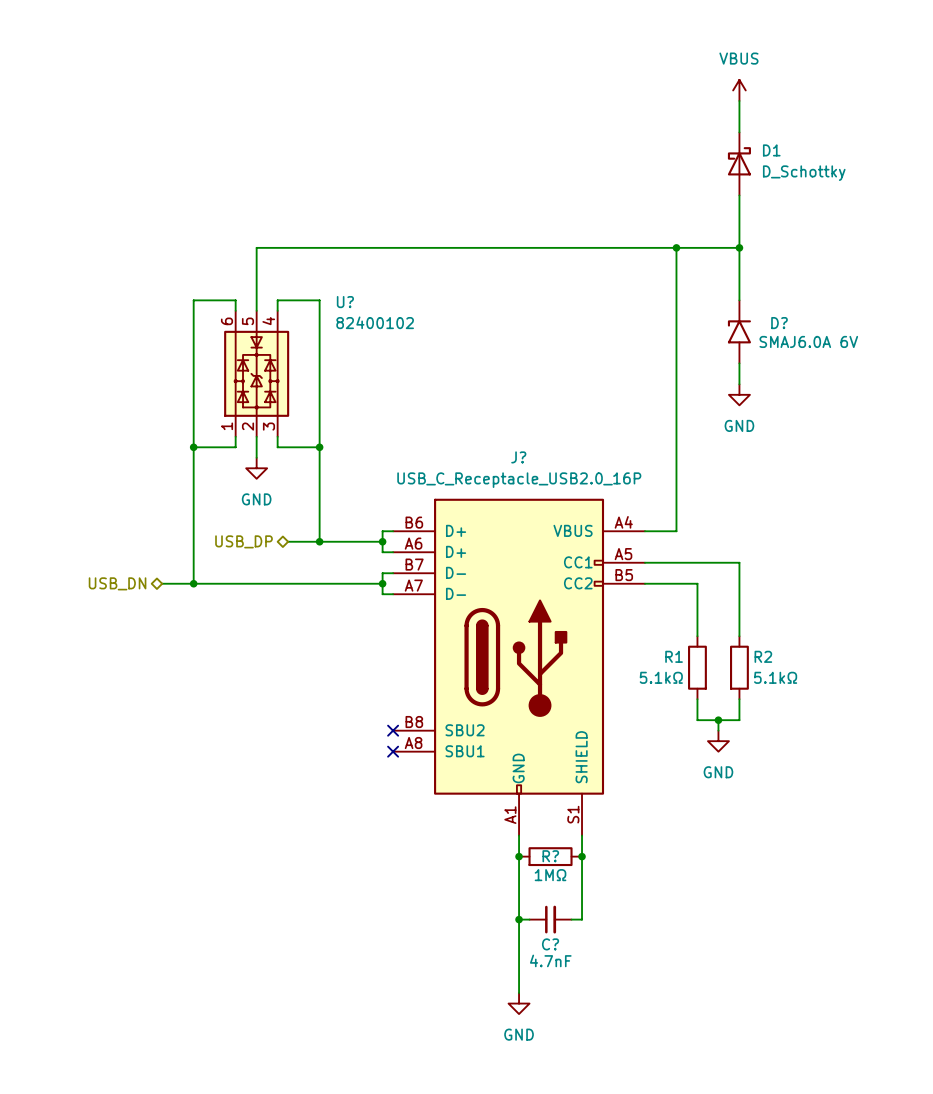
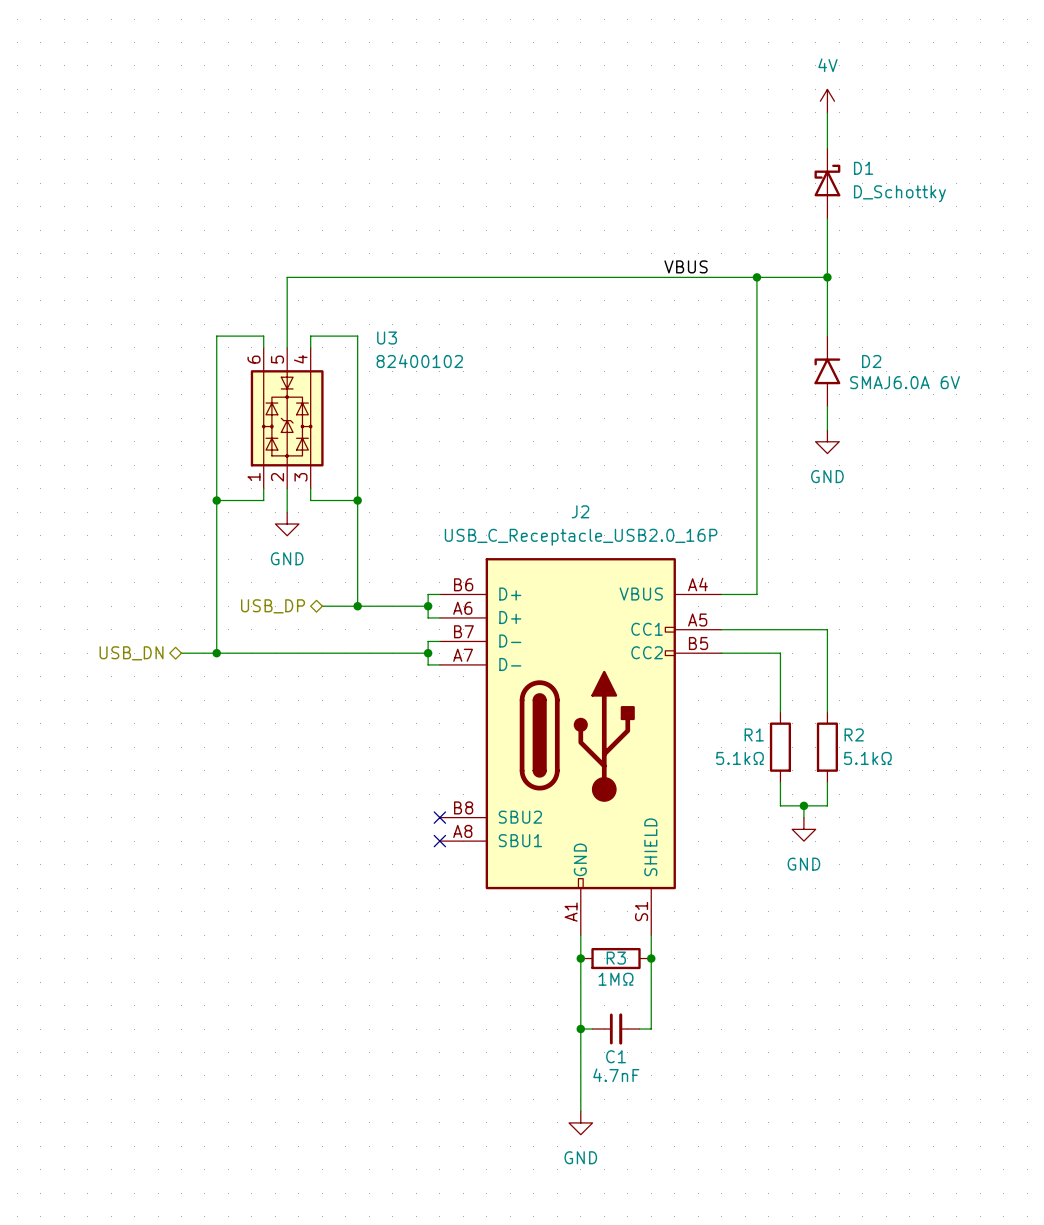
power symbol: VBUS (739, 90) -> 4V (827, 101)
label: none -> VBUS (686, 266)
U? name: U? (345, 302) -> U3 (387, 338)
D? name: D? (779, 323) -> D2 (871, 361)
J? name: J? (518, 457) -> J2 (580, 511)
R? name: R? (550, 856) -> R3 (616, 958)
C? name: C? (550, 944) -> C1 (616, 1056)

